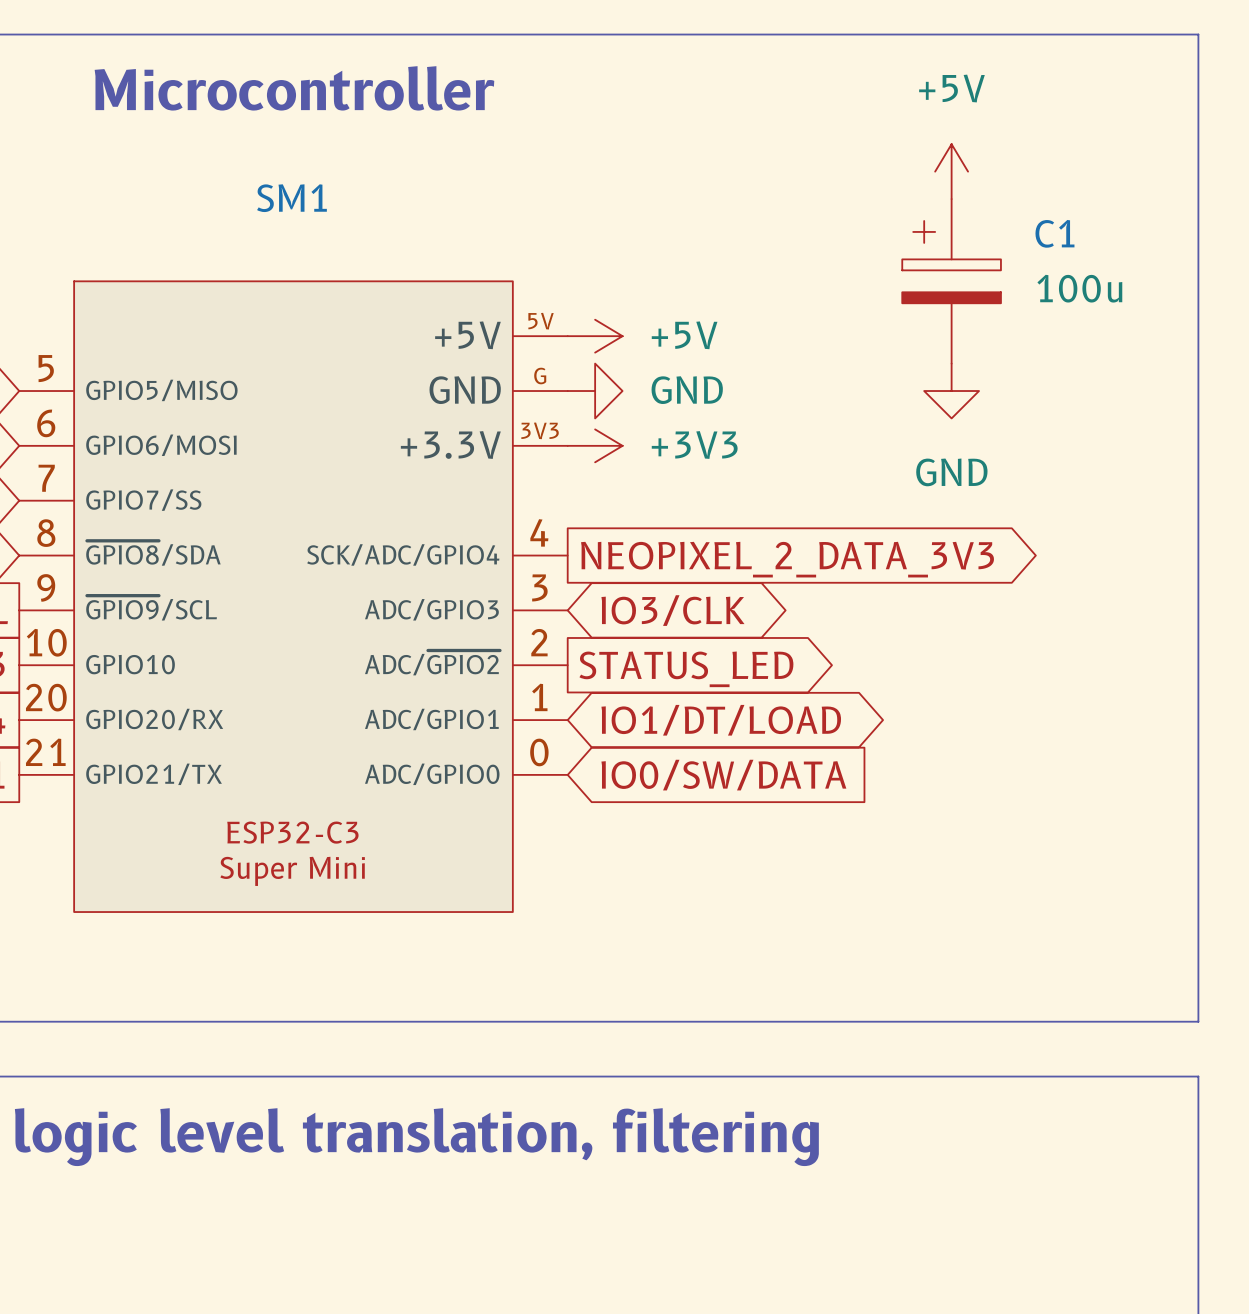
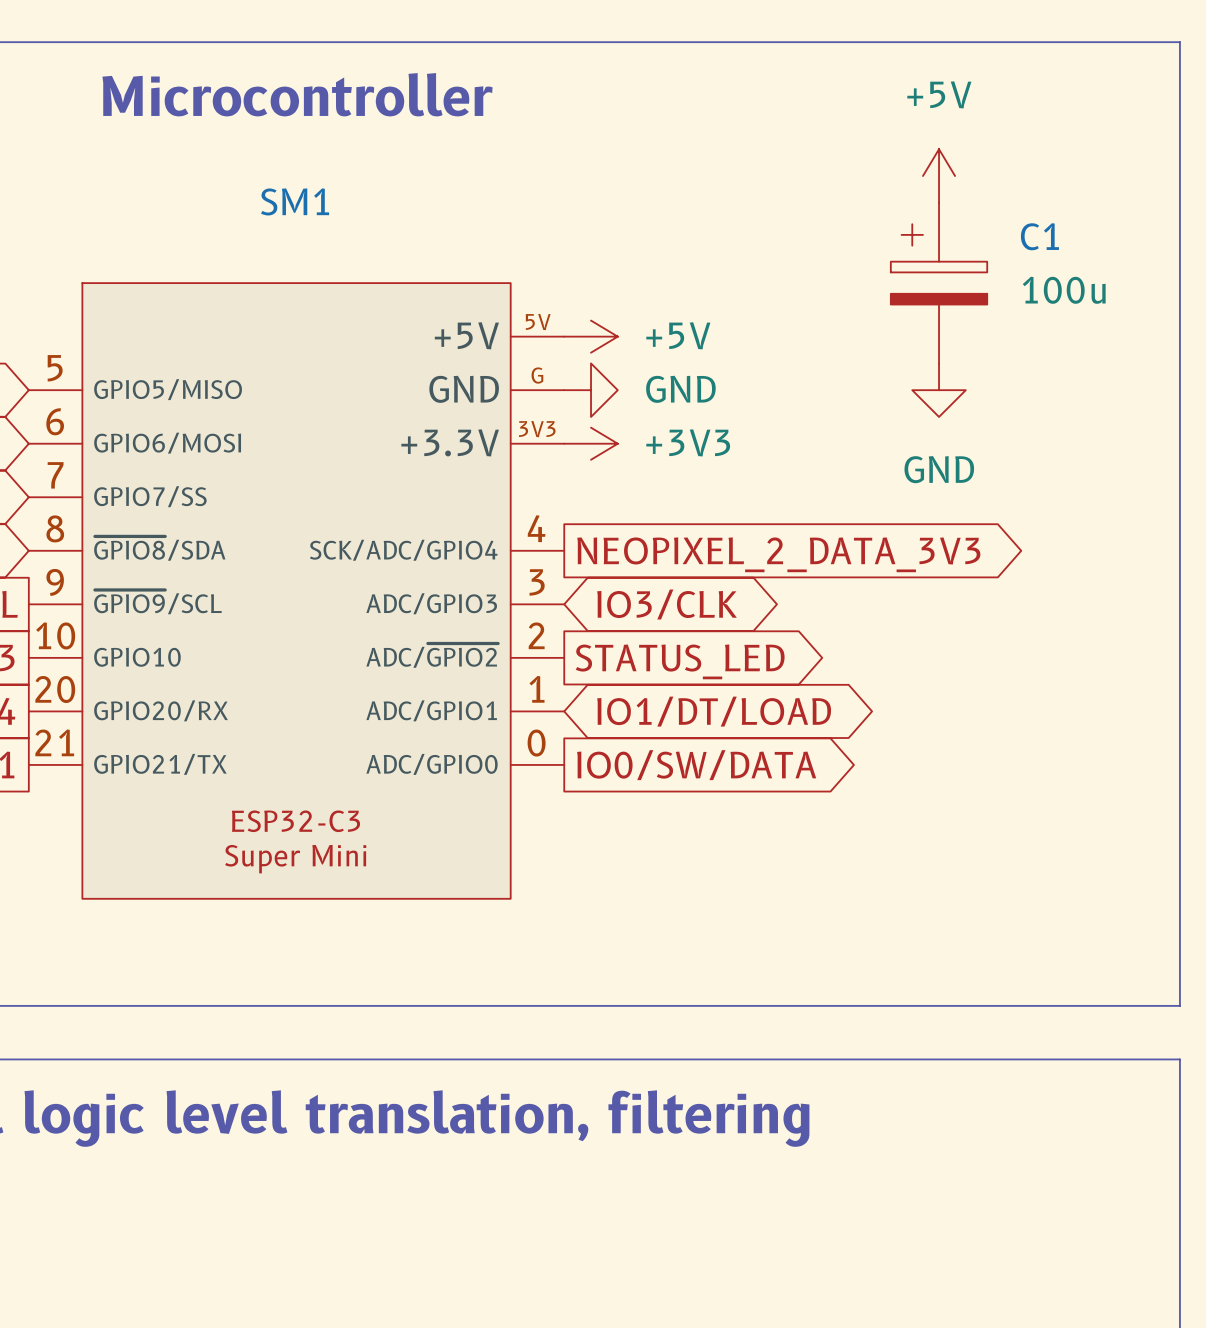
global label shape: input (723, 775) -> output (696, 765)

